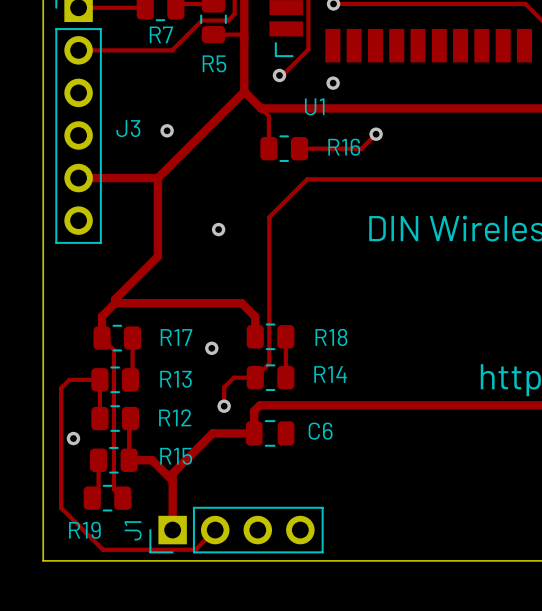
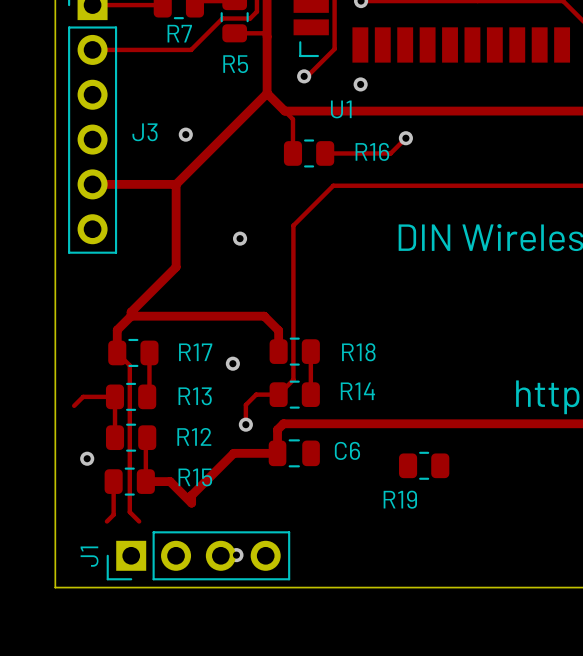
track: (61, 388) (61, 507) (102, 549) (195, 549) (215, 530) -> none
track: (172, 480) (172, 530) -> none
R19 position: (107, 498) -> (424, 465)
J1 position: (236, 530) -> (198, 555)

